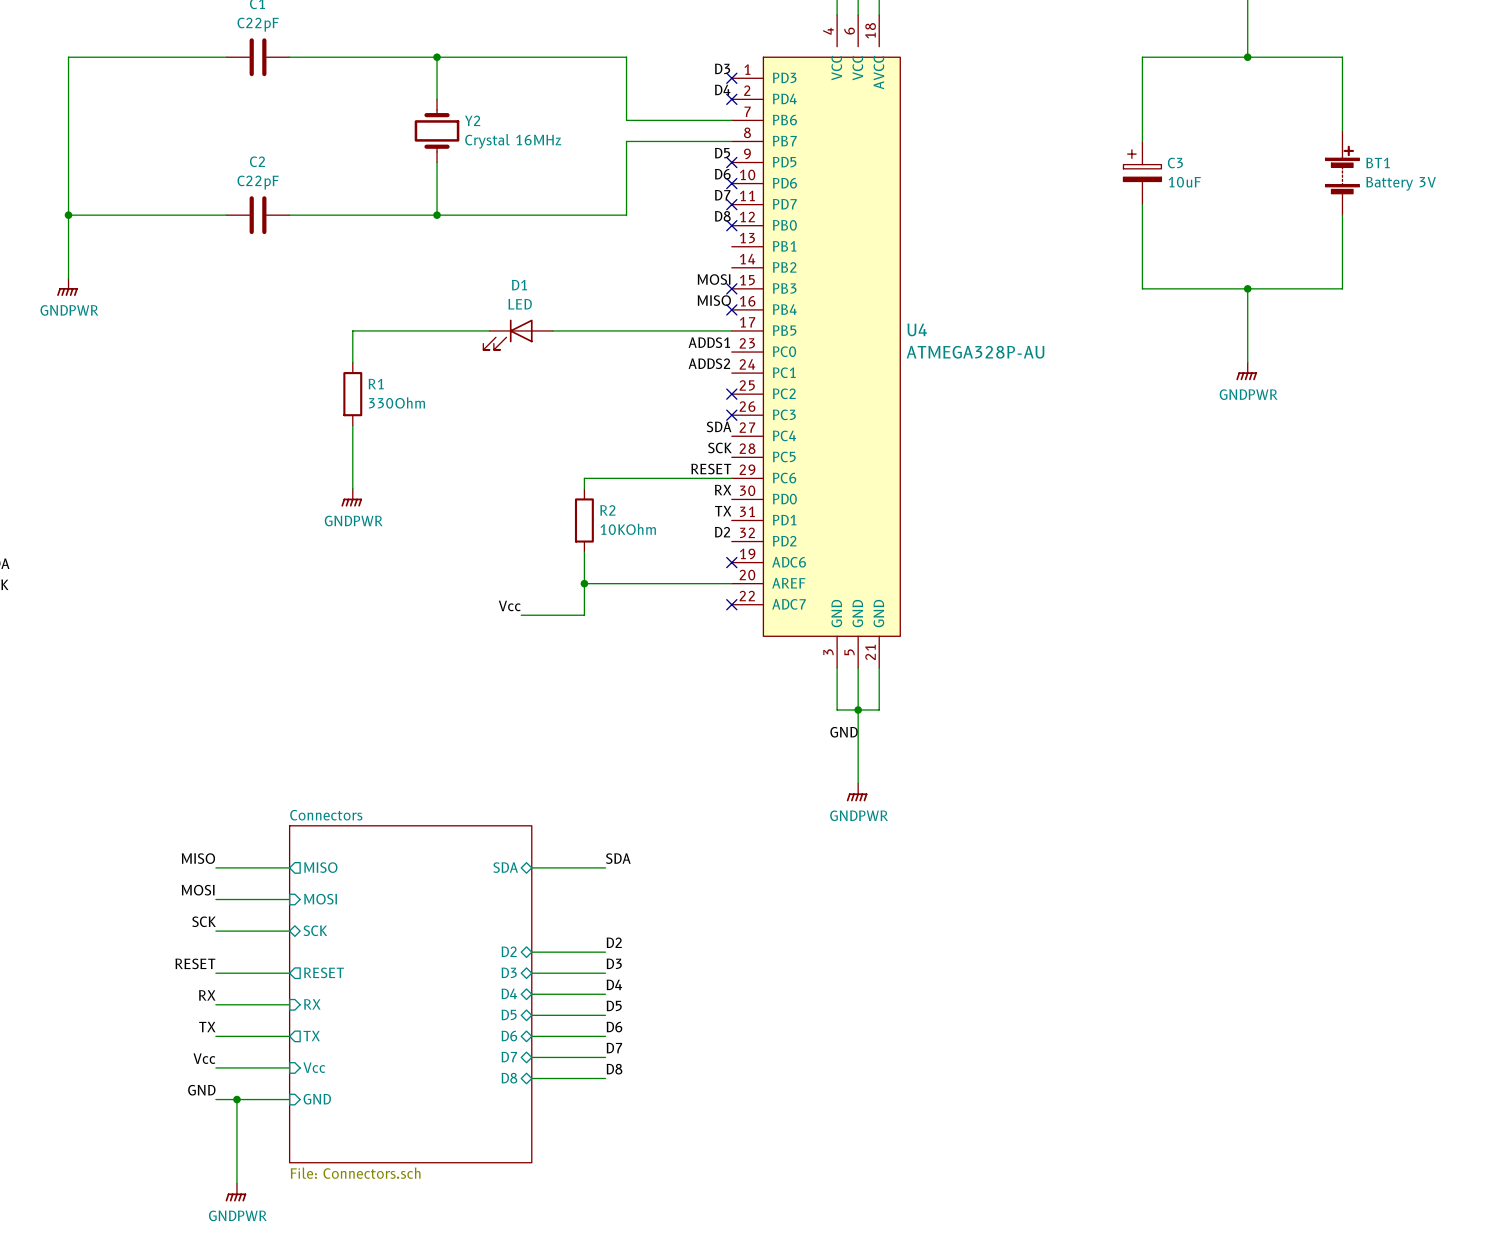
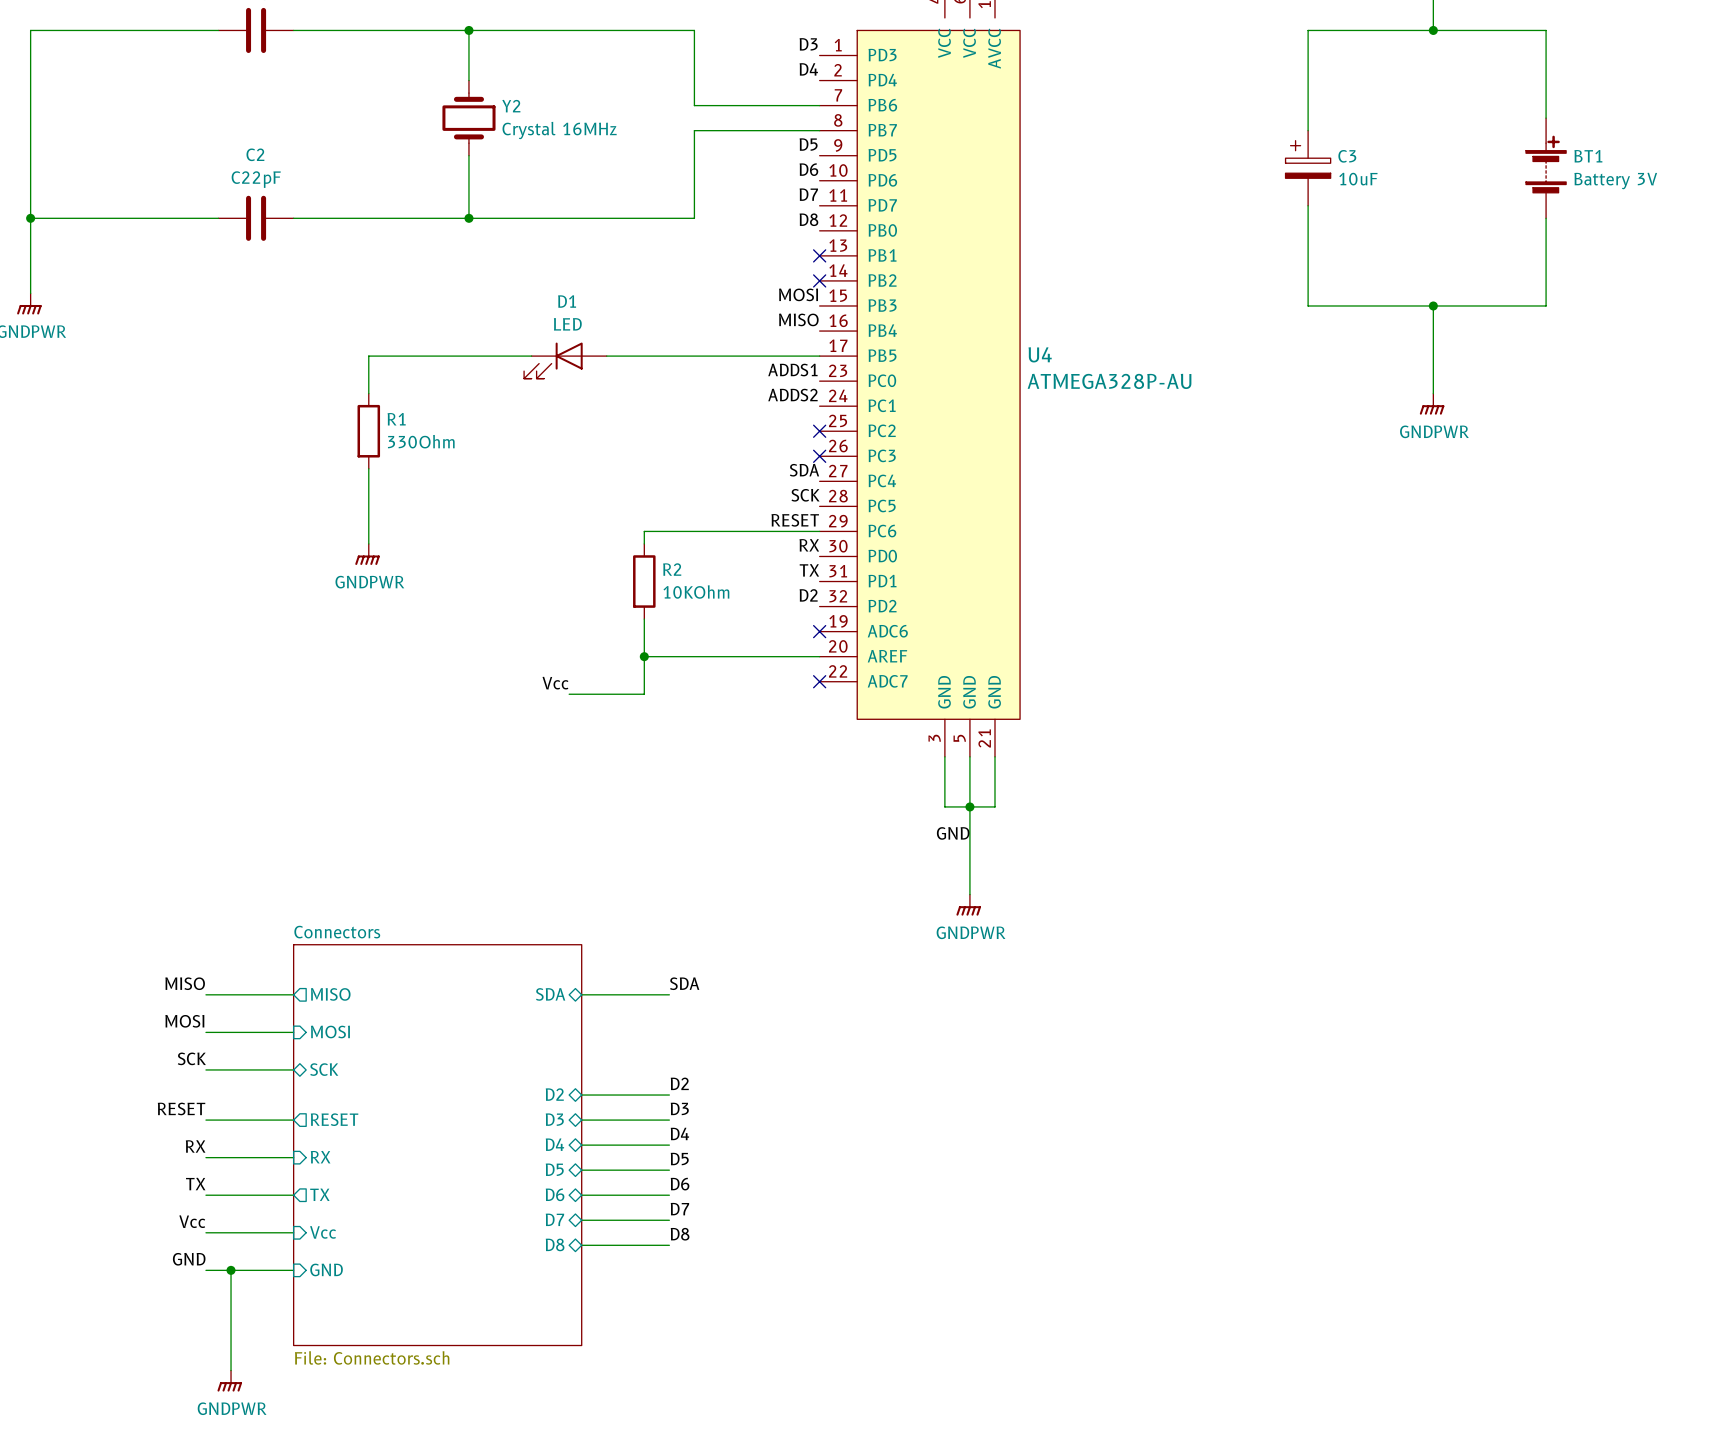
no-connect mark: (731, 78) -> none
no-connect mark: (731, 99) -> none
no-connect mark: (731, 162) -> none
no-connect mark: (731, 183) -> none
no-connect mark: (731, 204) -> none
no-connect mark: (731, 225) -> none
no-connect mark: none -> (819, 255)
no-connect mark: none -> (819, 280)
no-connect mark: (731, 288) -> none
no-connect mark: (731, 309) -> none

